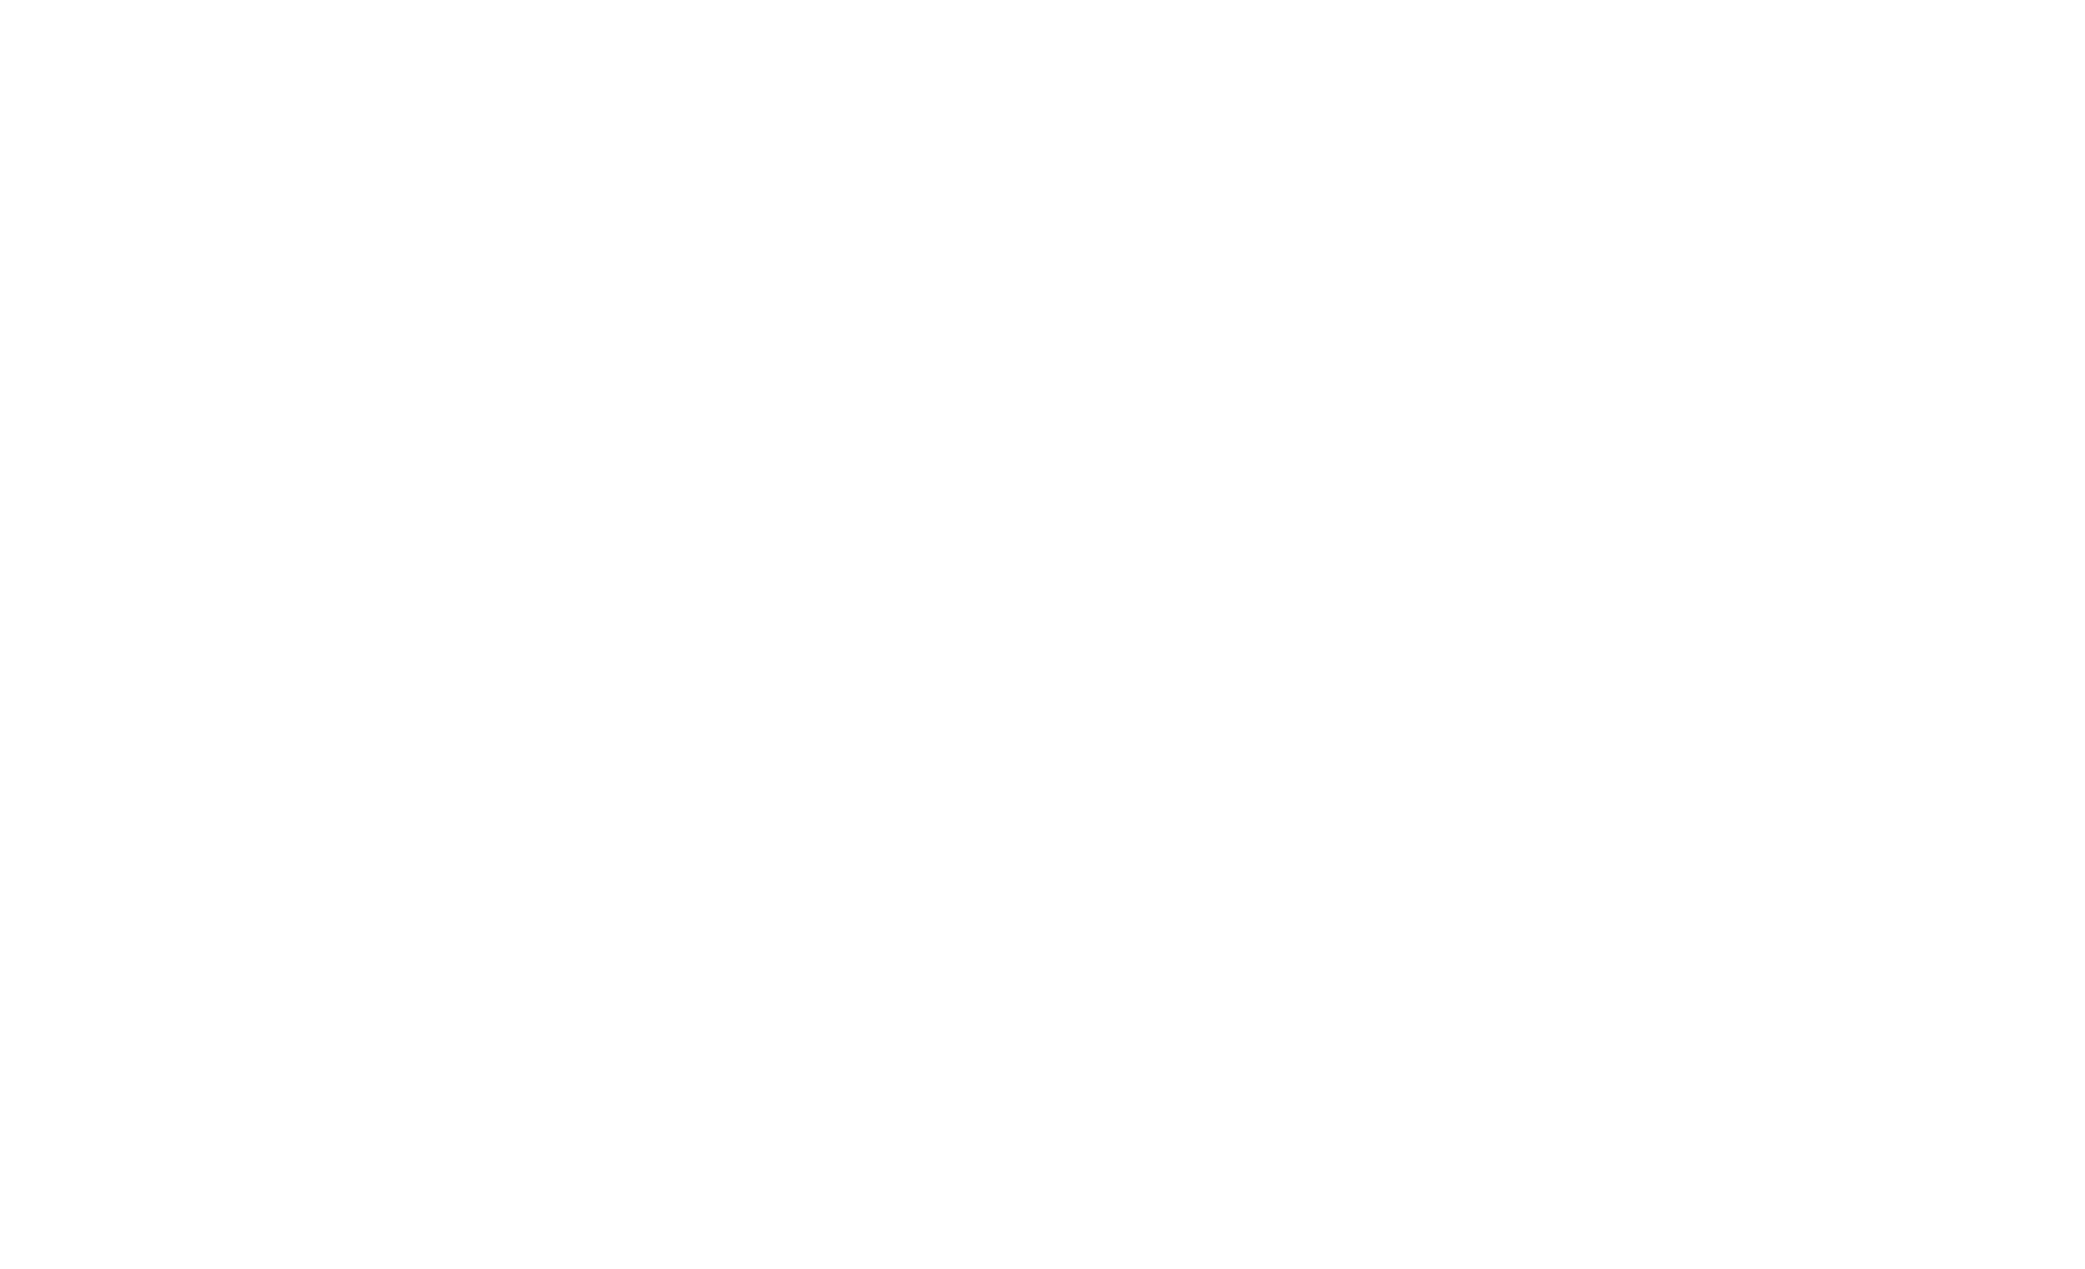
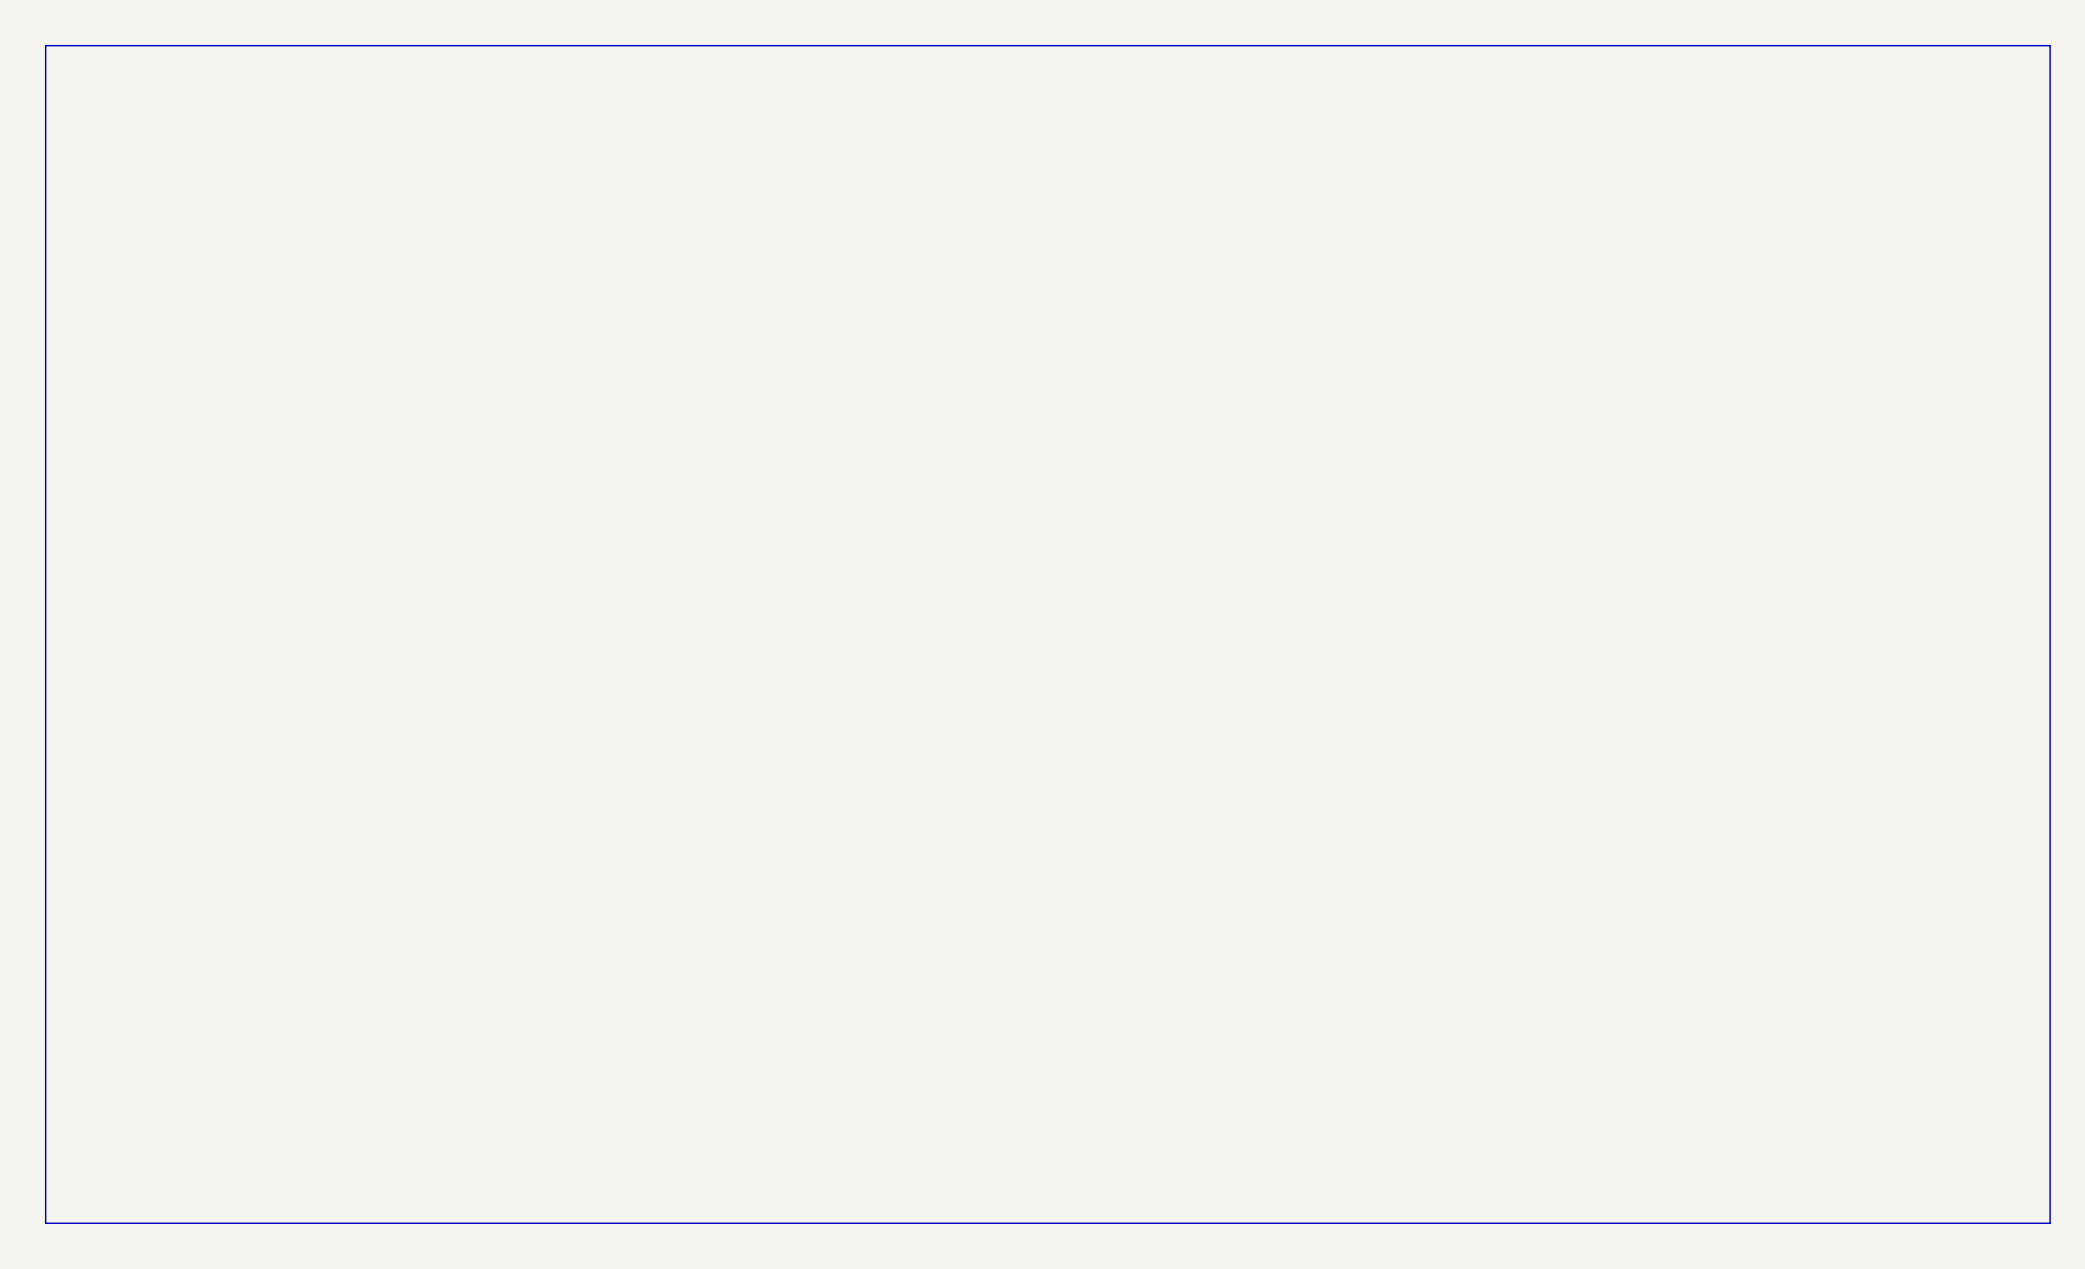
line: none -> (45, 45) (2050, 45) (2050, 1223) (45, 1223) (45, 45)

